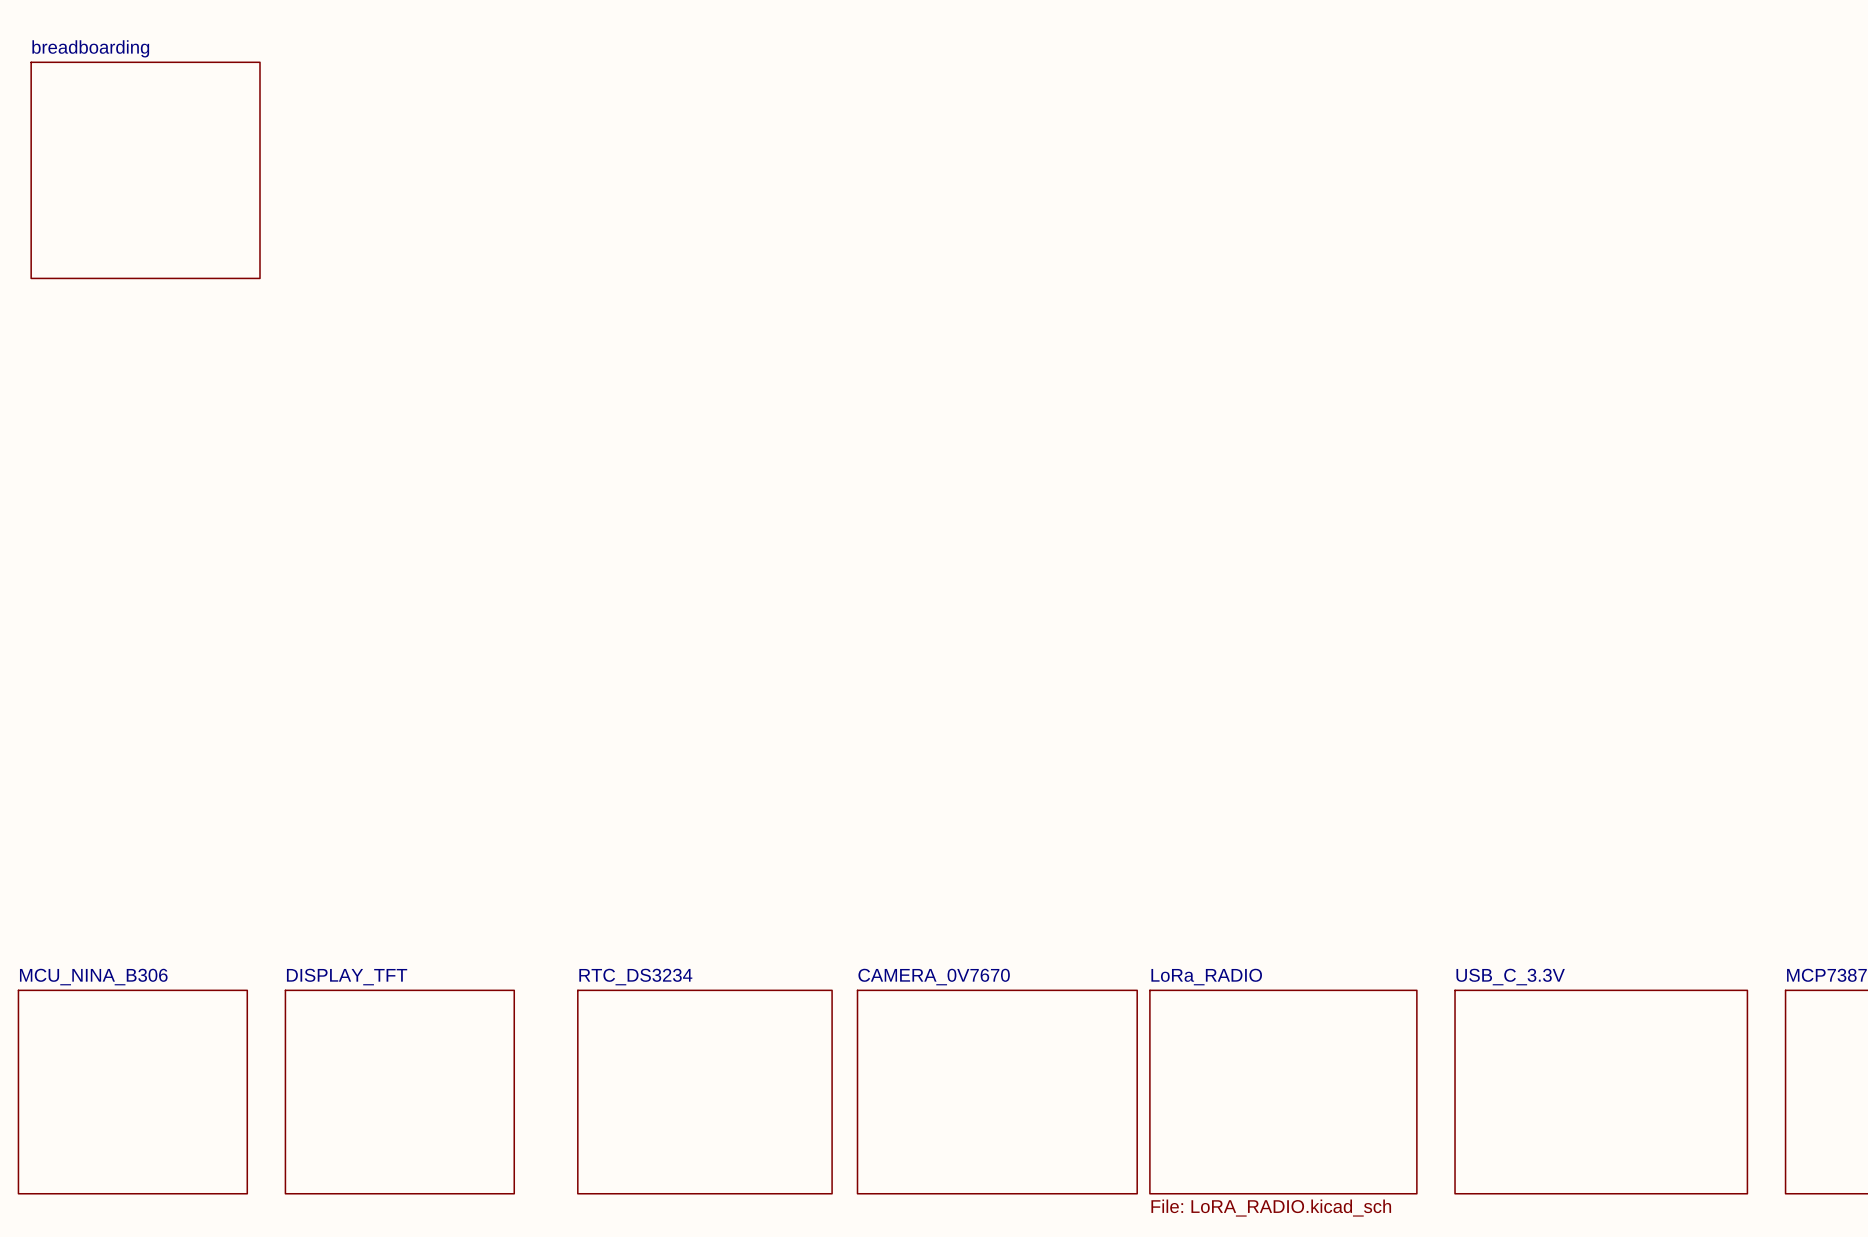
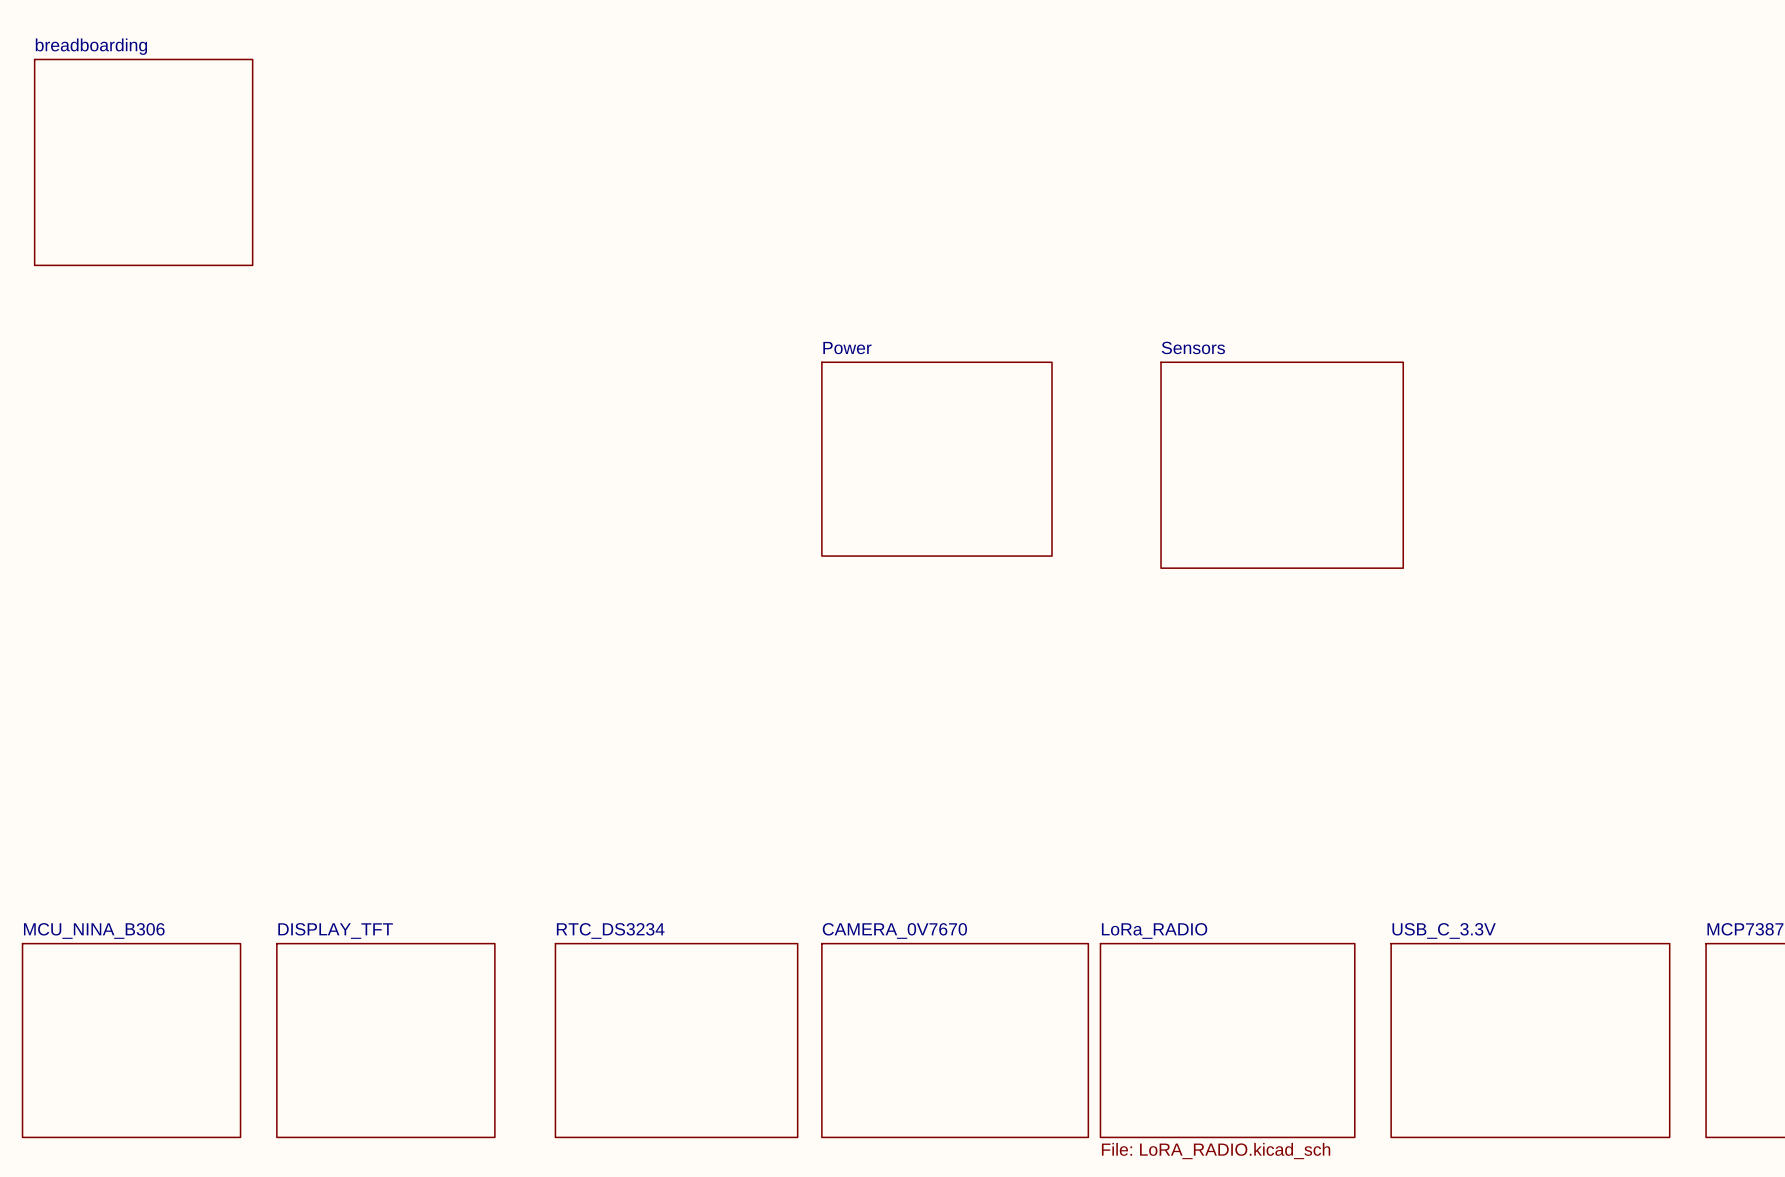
sheet Power: none -> (936, 459)
sheet Sensors: none -> (1282, 465)

